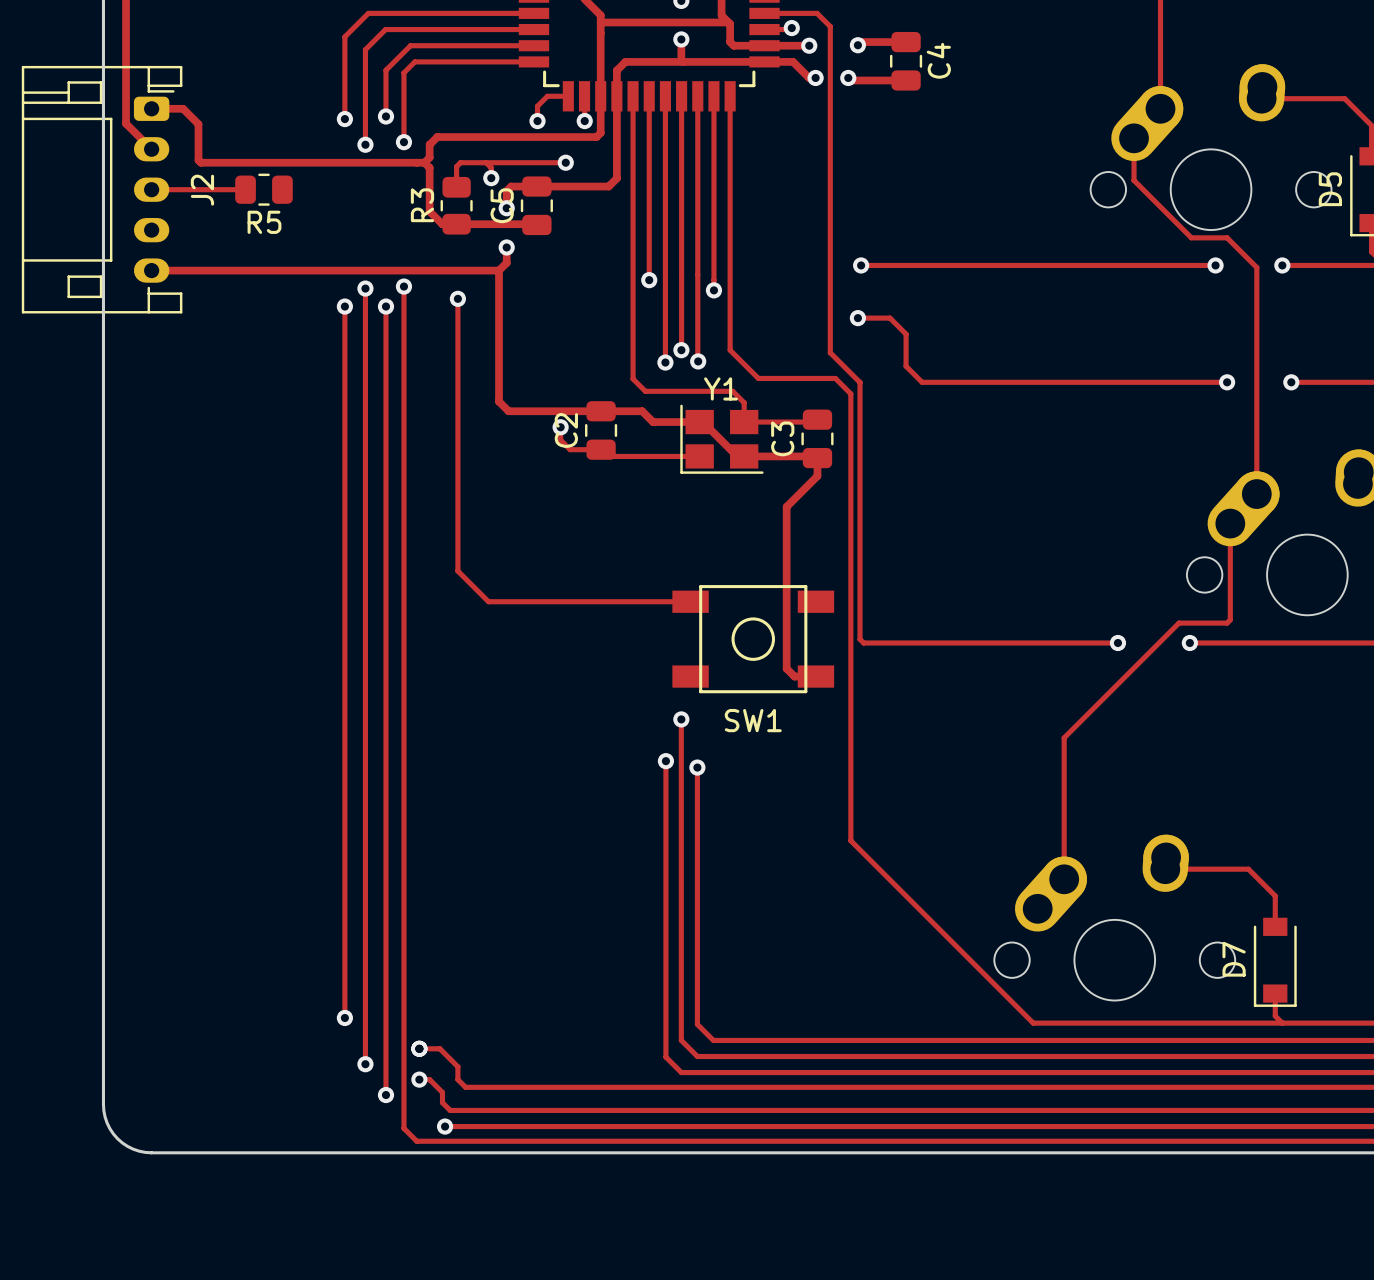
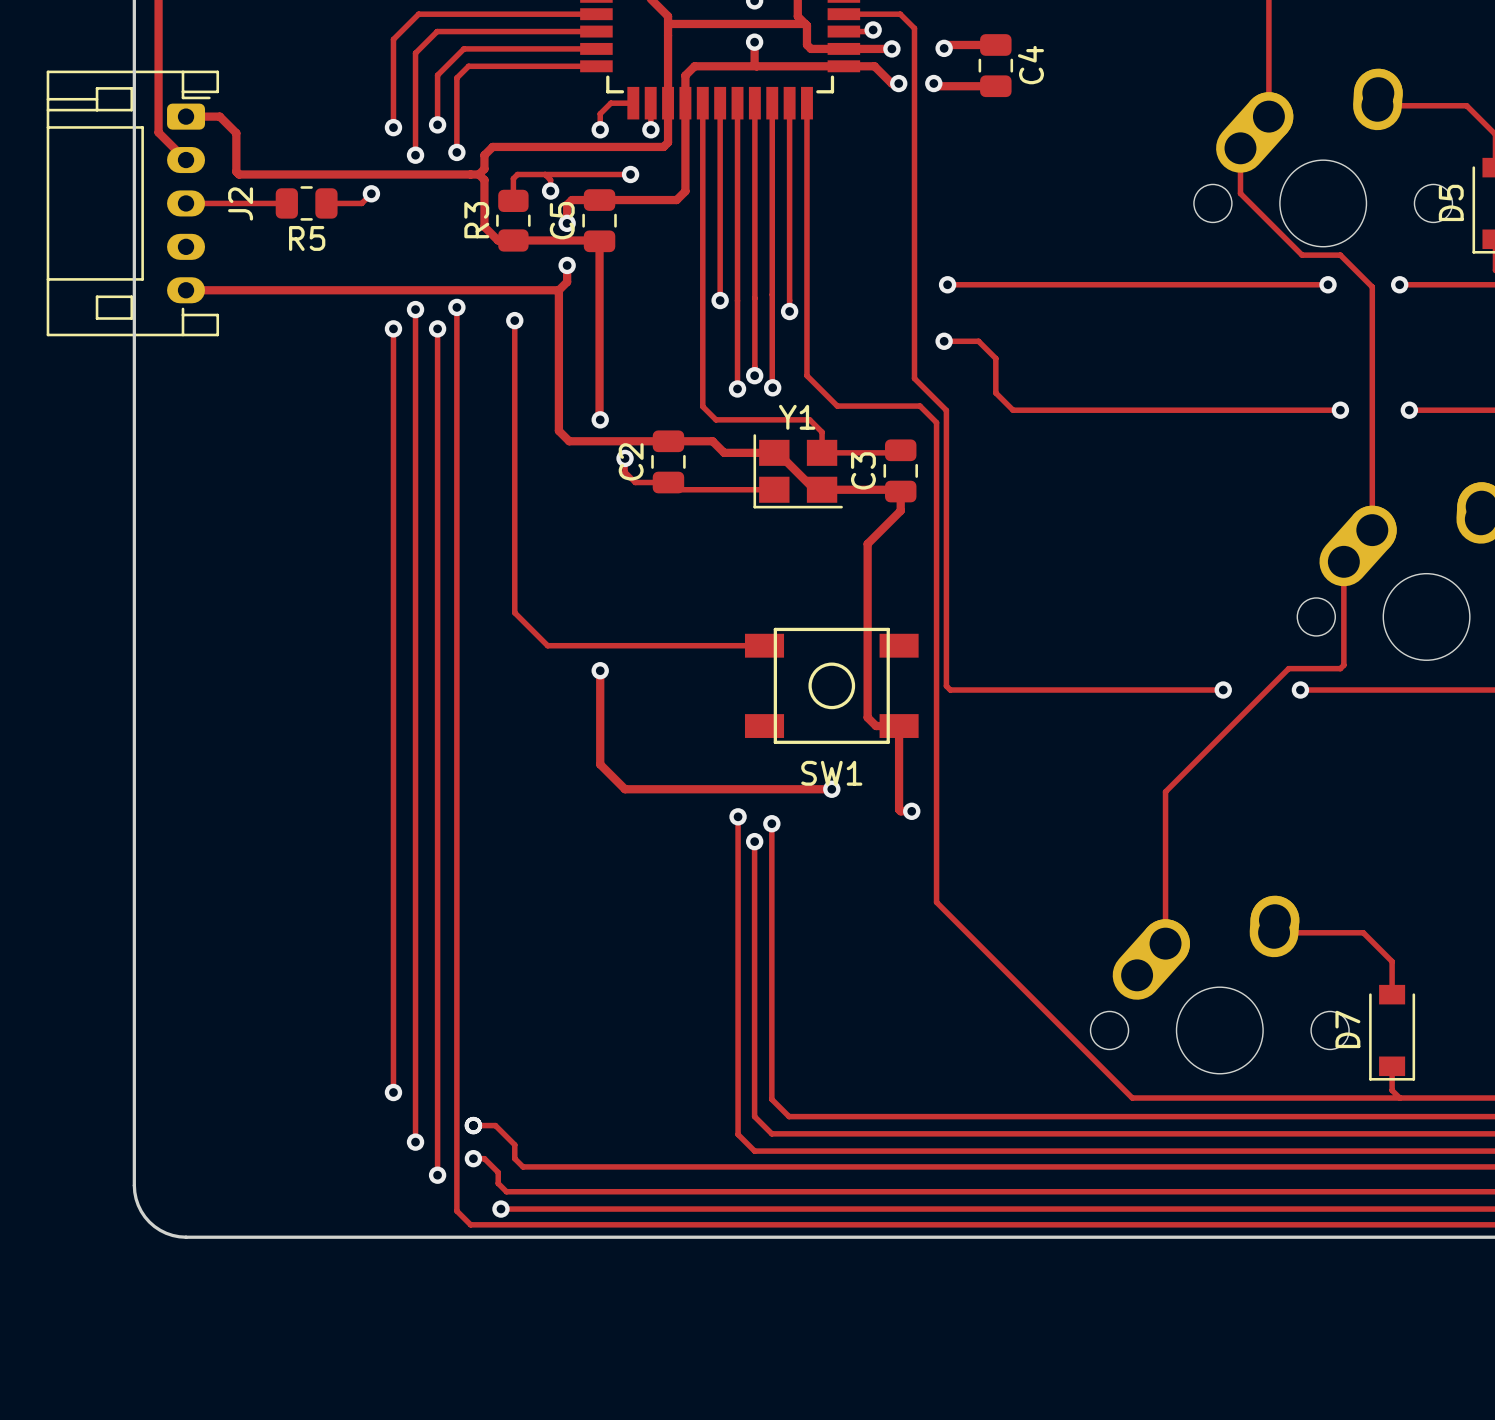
track: none -> (371, 193) (361, 203) (326, 203)
via: none -> (371, 193)
track: none -> (599, 241) (600, 419)
via: none -> (600, 419)
track: none -> (600, 670) (600, 764) (625, 789) (831, 789)
via: none -> (600, 670)
track: none -> (899, 726) (899, 809) (911, 811)
track: (681, 719) (681, 784) -> none
via: (681, 719) -> none
via: none -> (831, 789)
via: none -> (911, 811)
via: none -> (754, 841)

